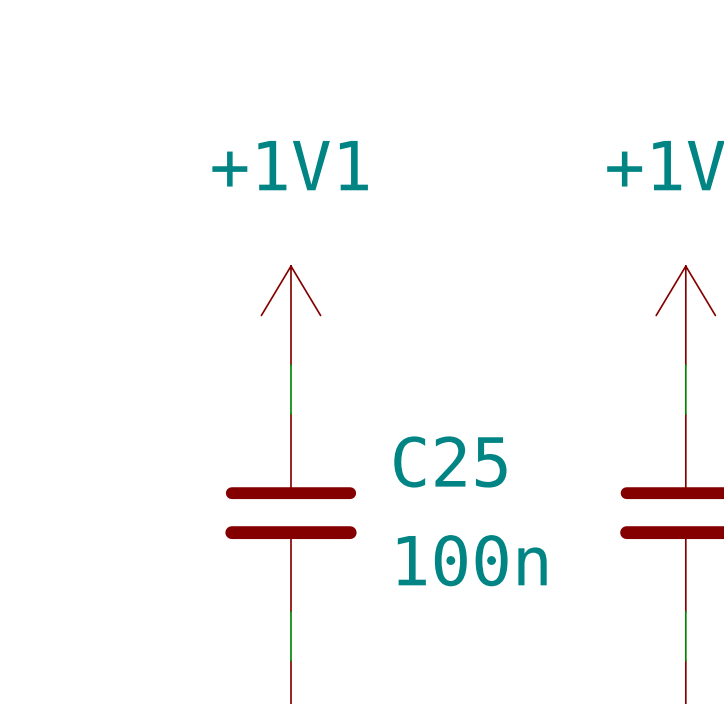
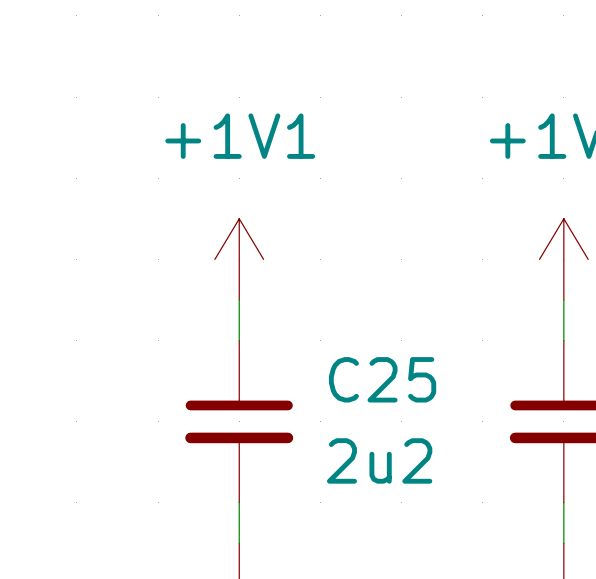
C25 value: 100n (472, 560) -> 2u2 (379, 460)

